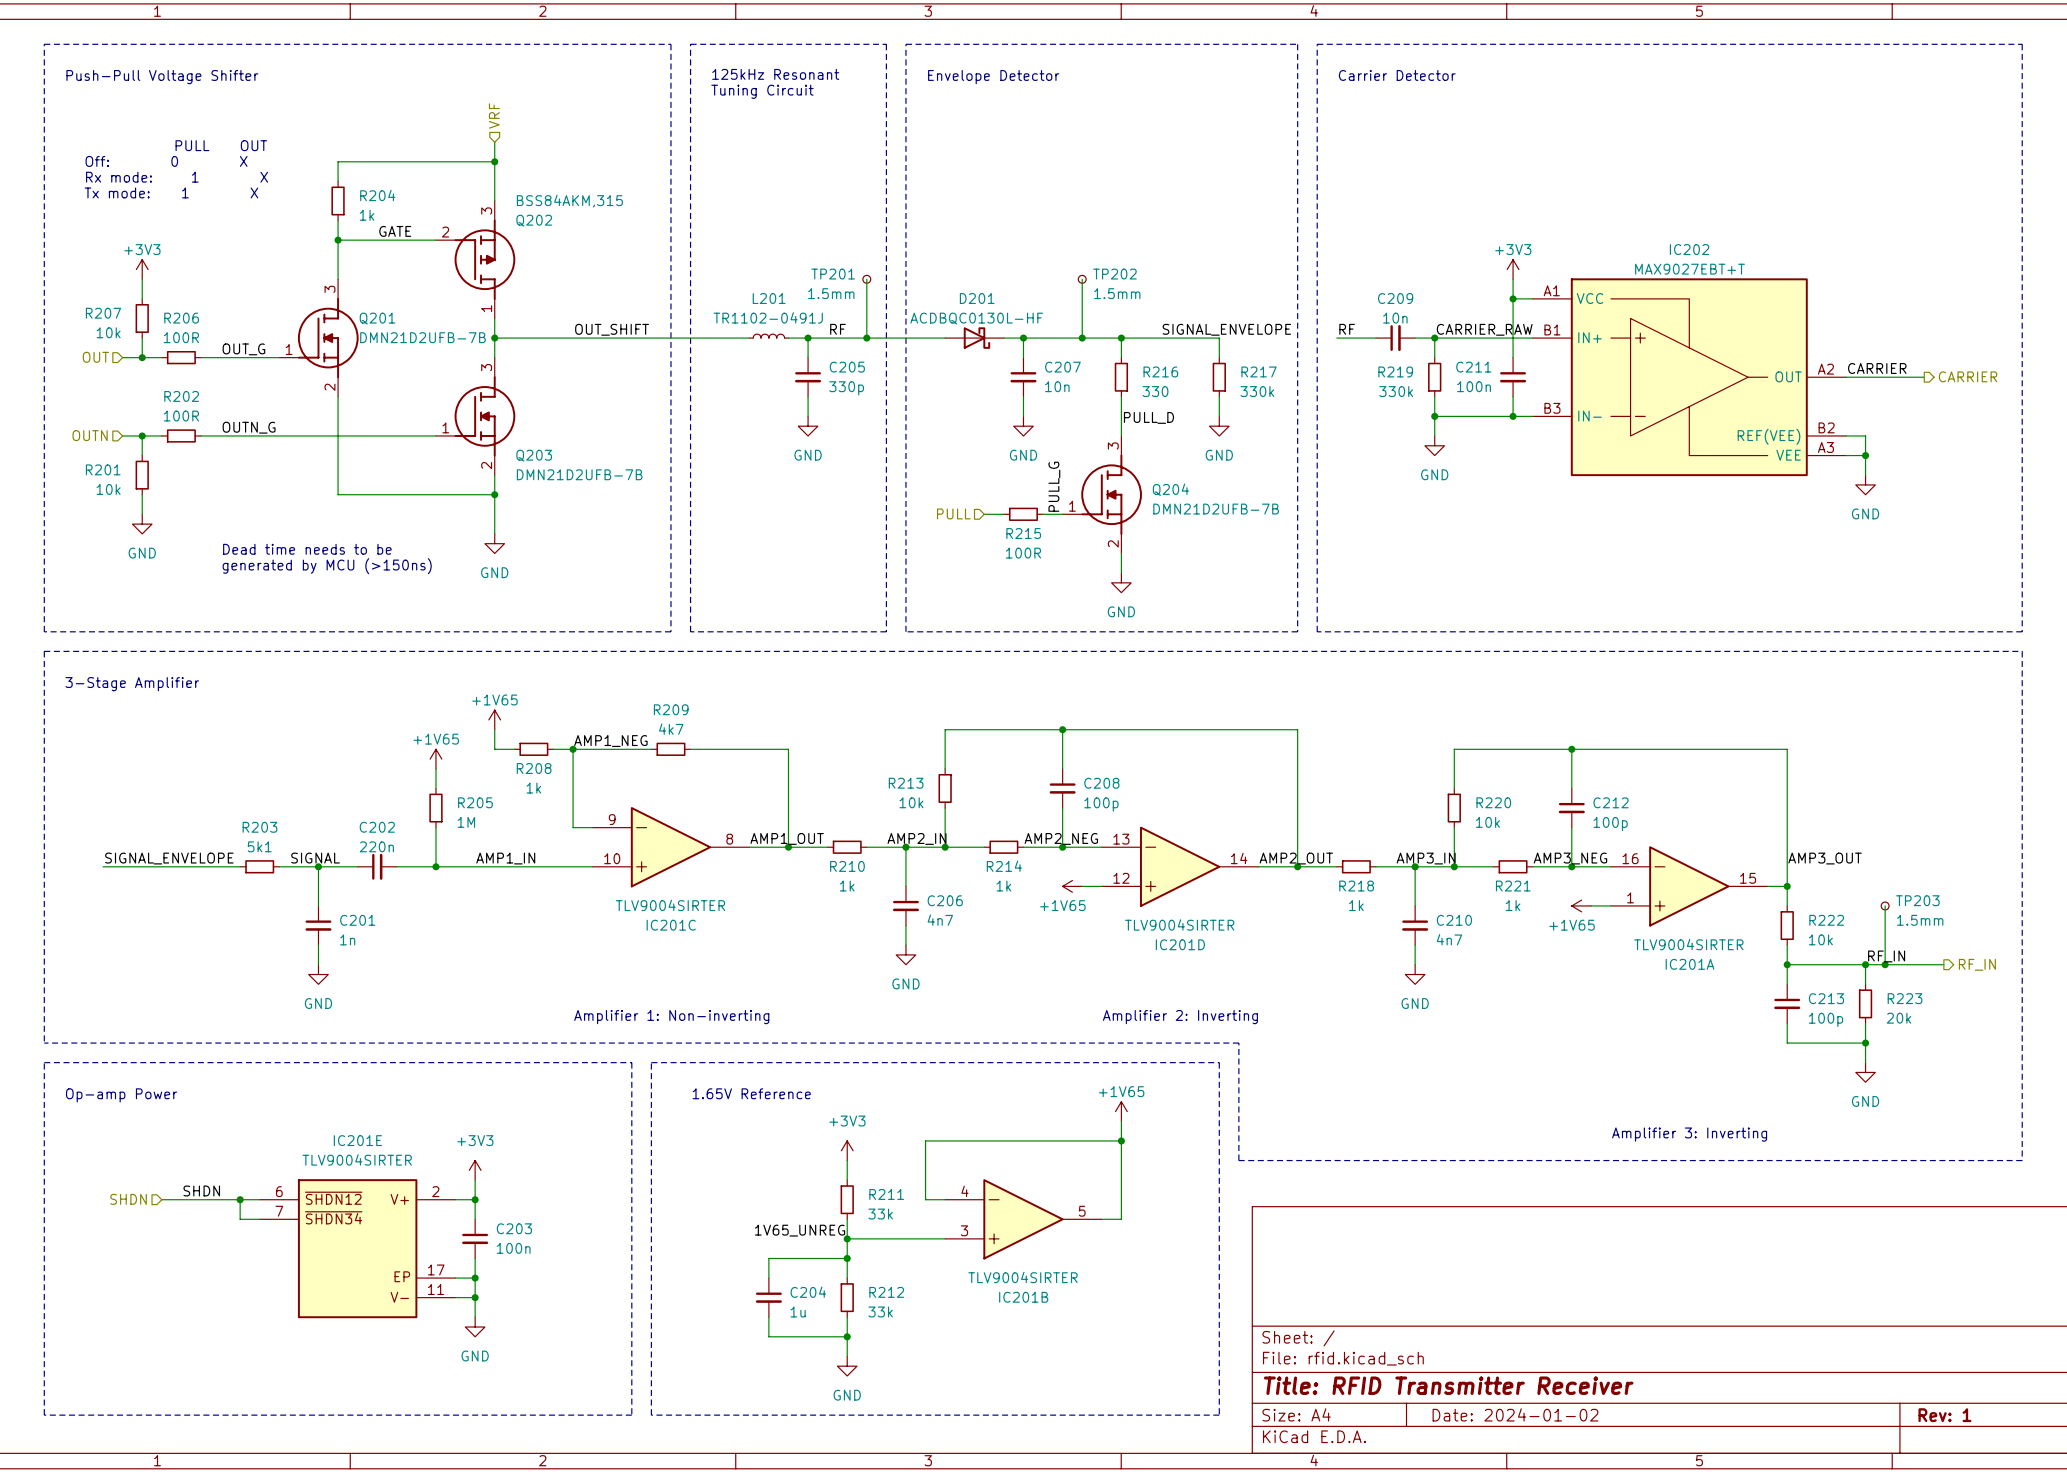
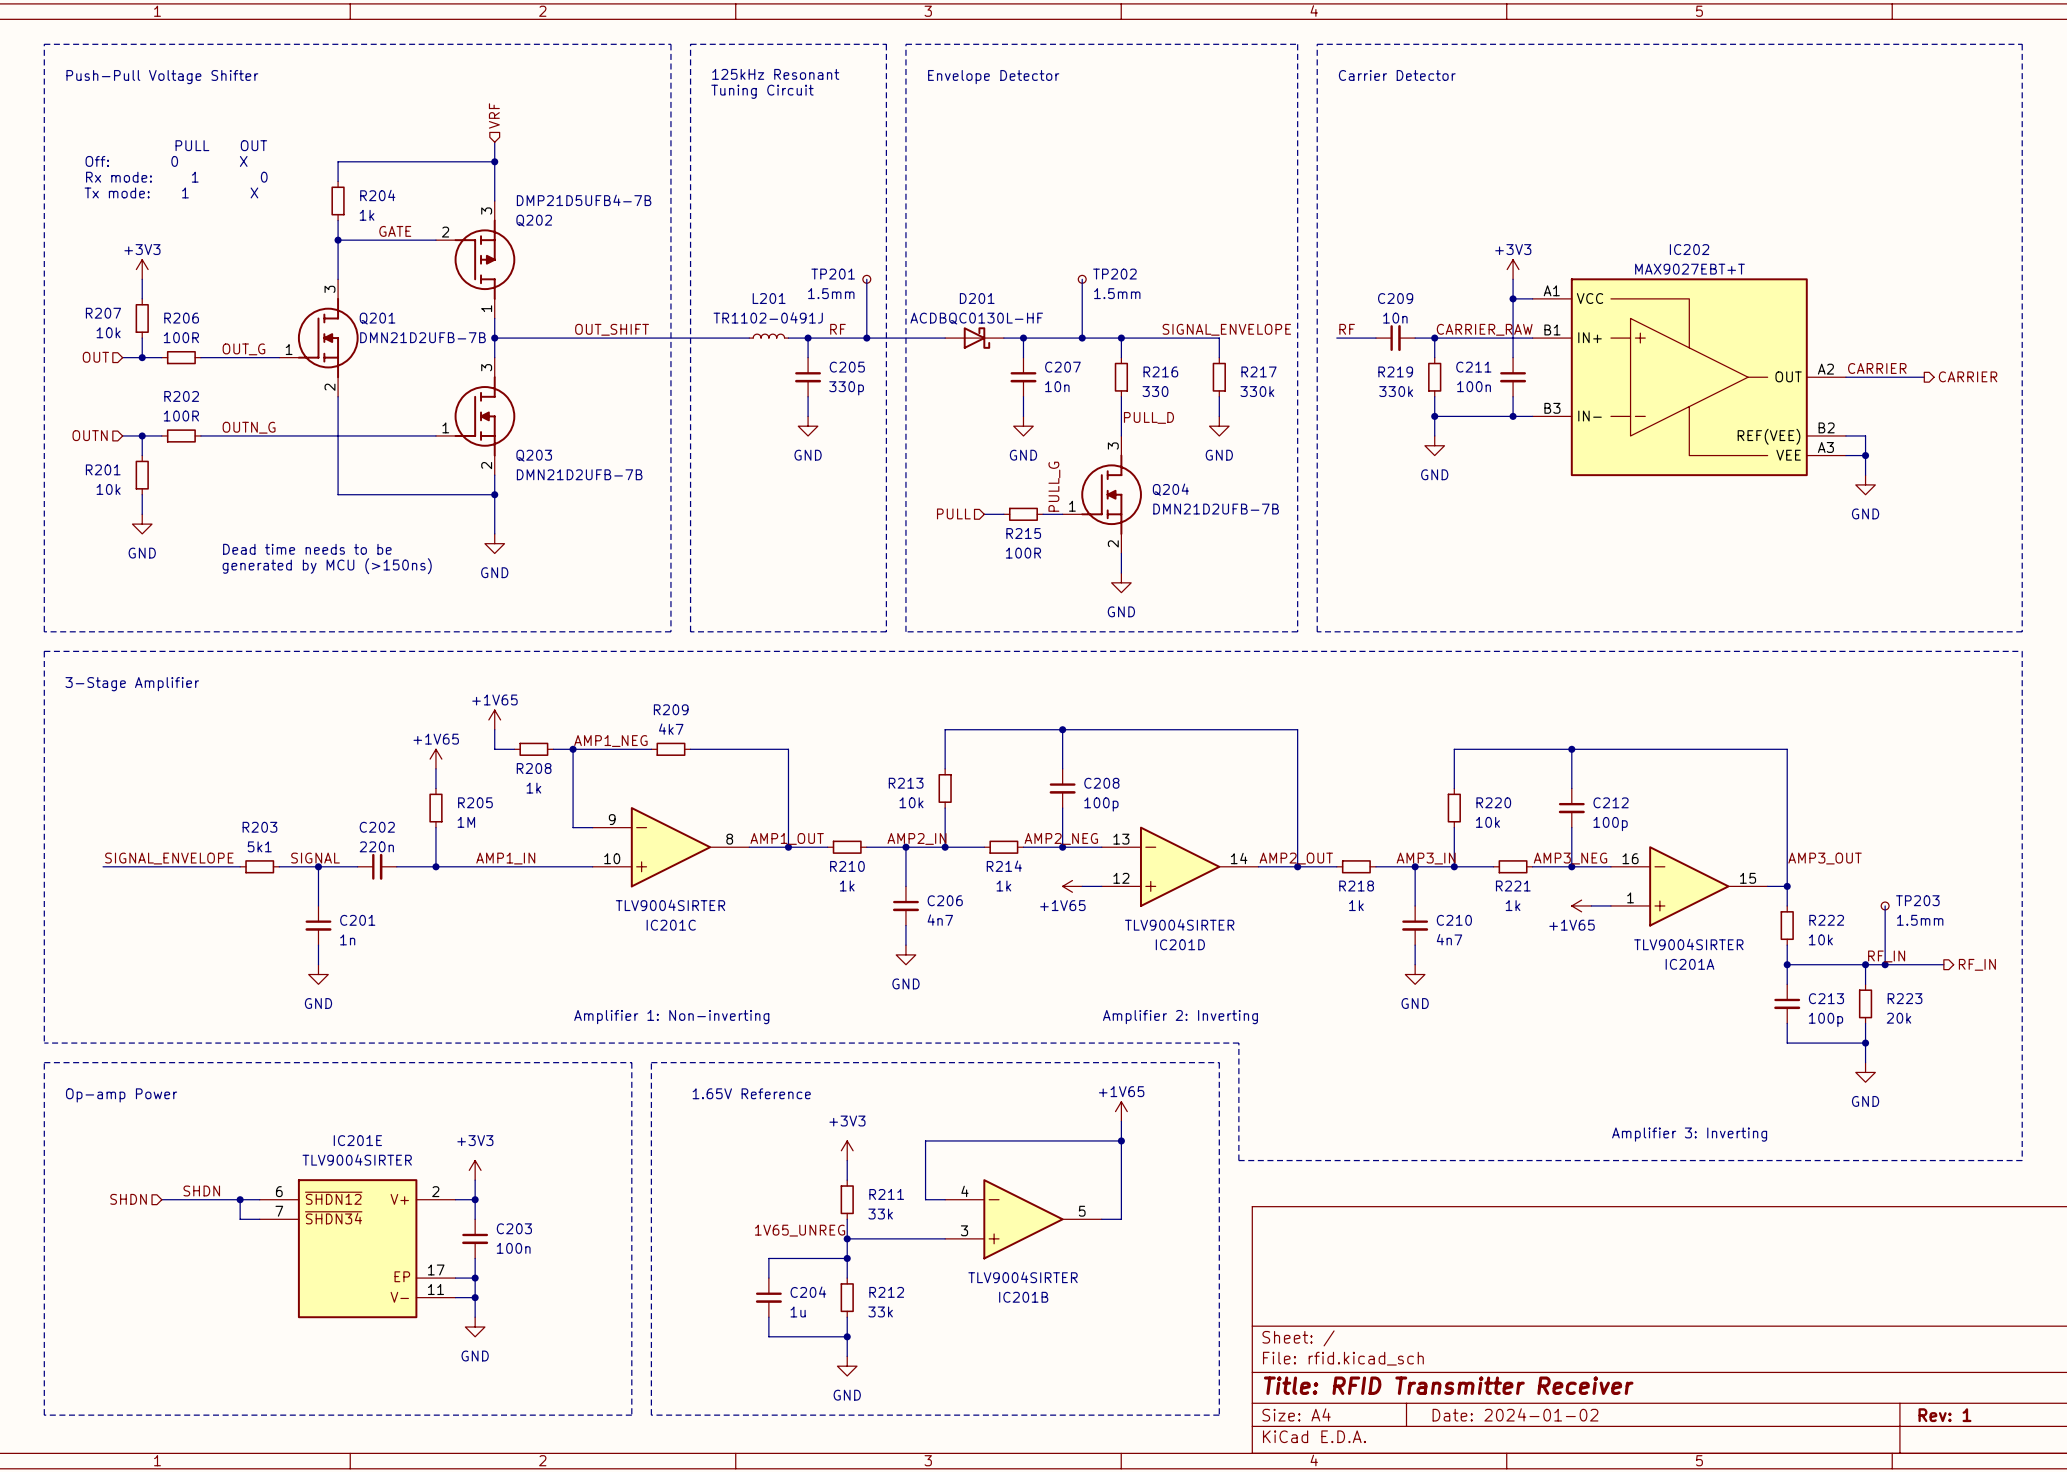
text: Rx mode: 1 X (177, 177) -> Rx mode: 1 0 (176, 177)
Q202 value: BSS84AKM,315 (569, 201) -> DMP21D5UFB4-7B (584, 200)

